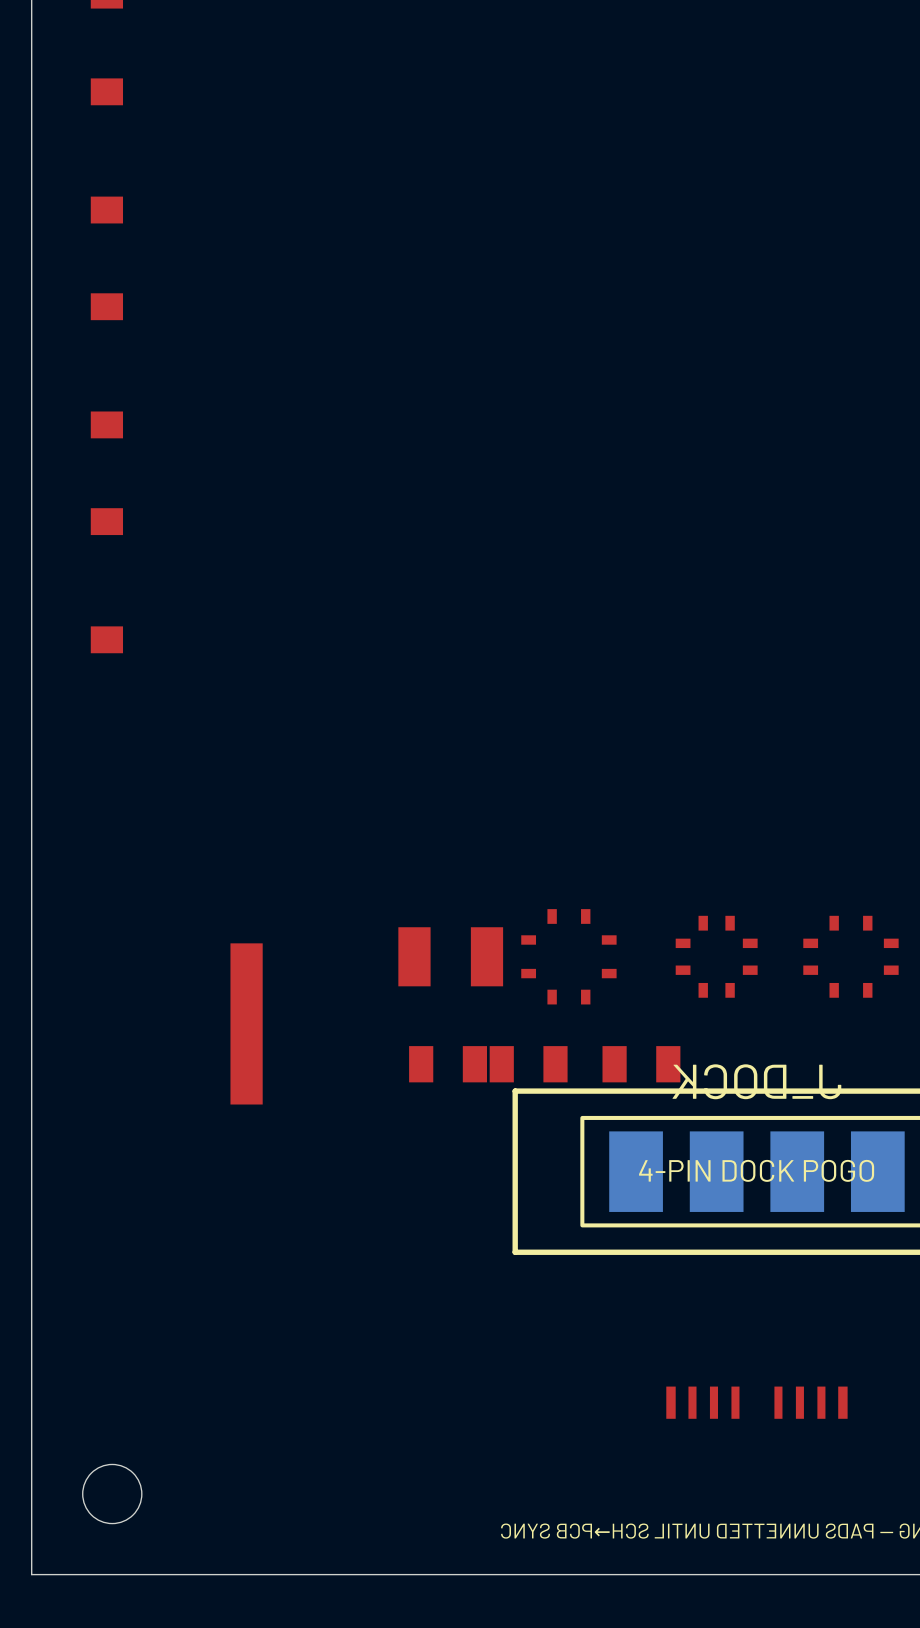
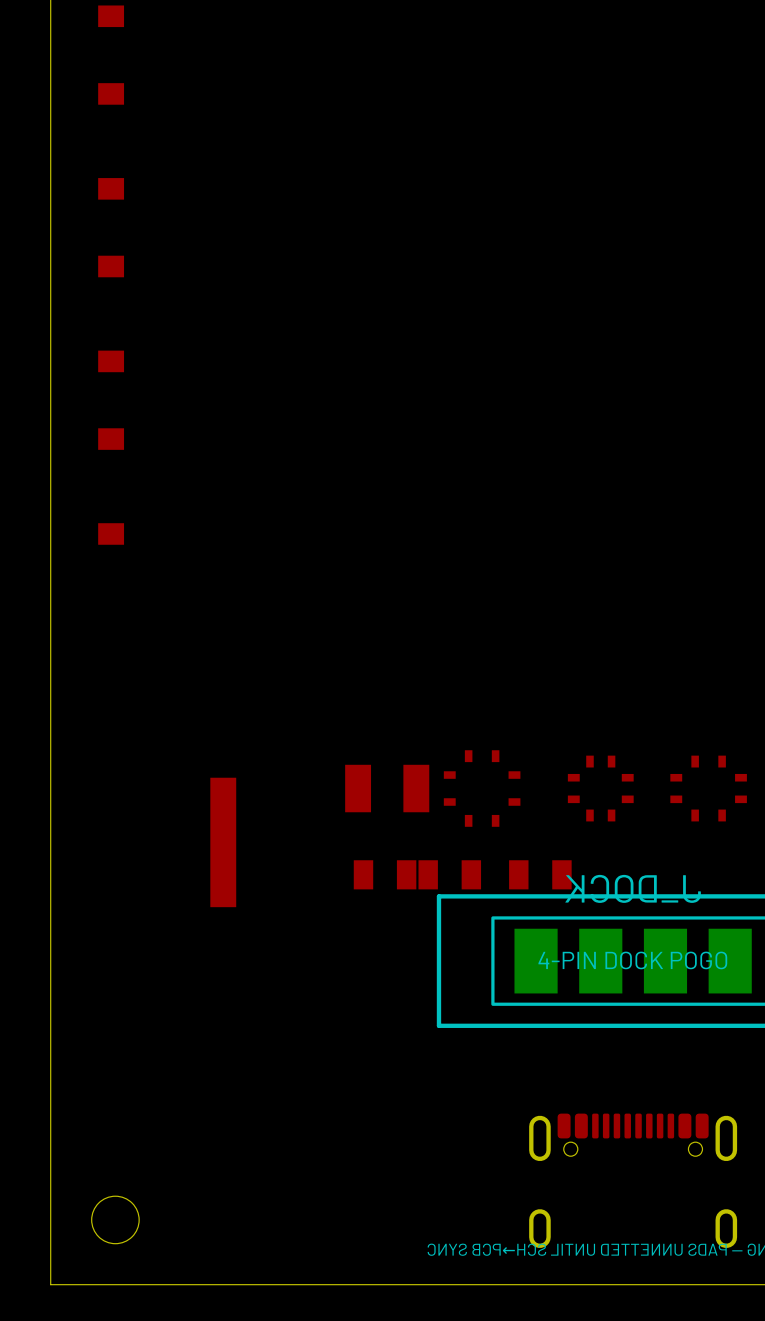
part: (756, 1402) -> none
part: none -> (633, 1180)

